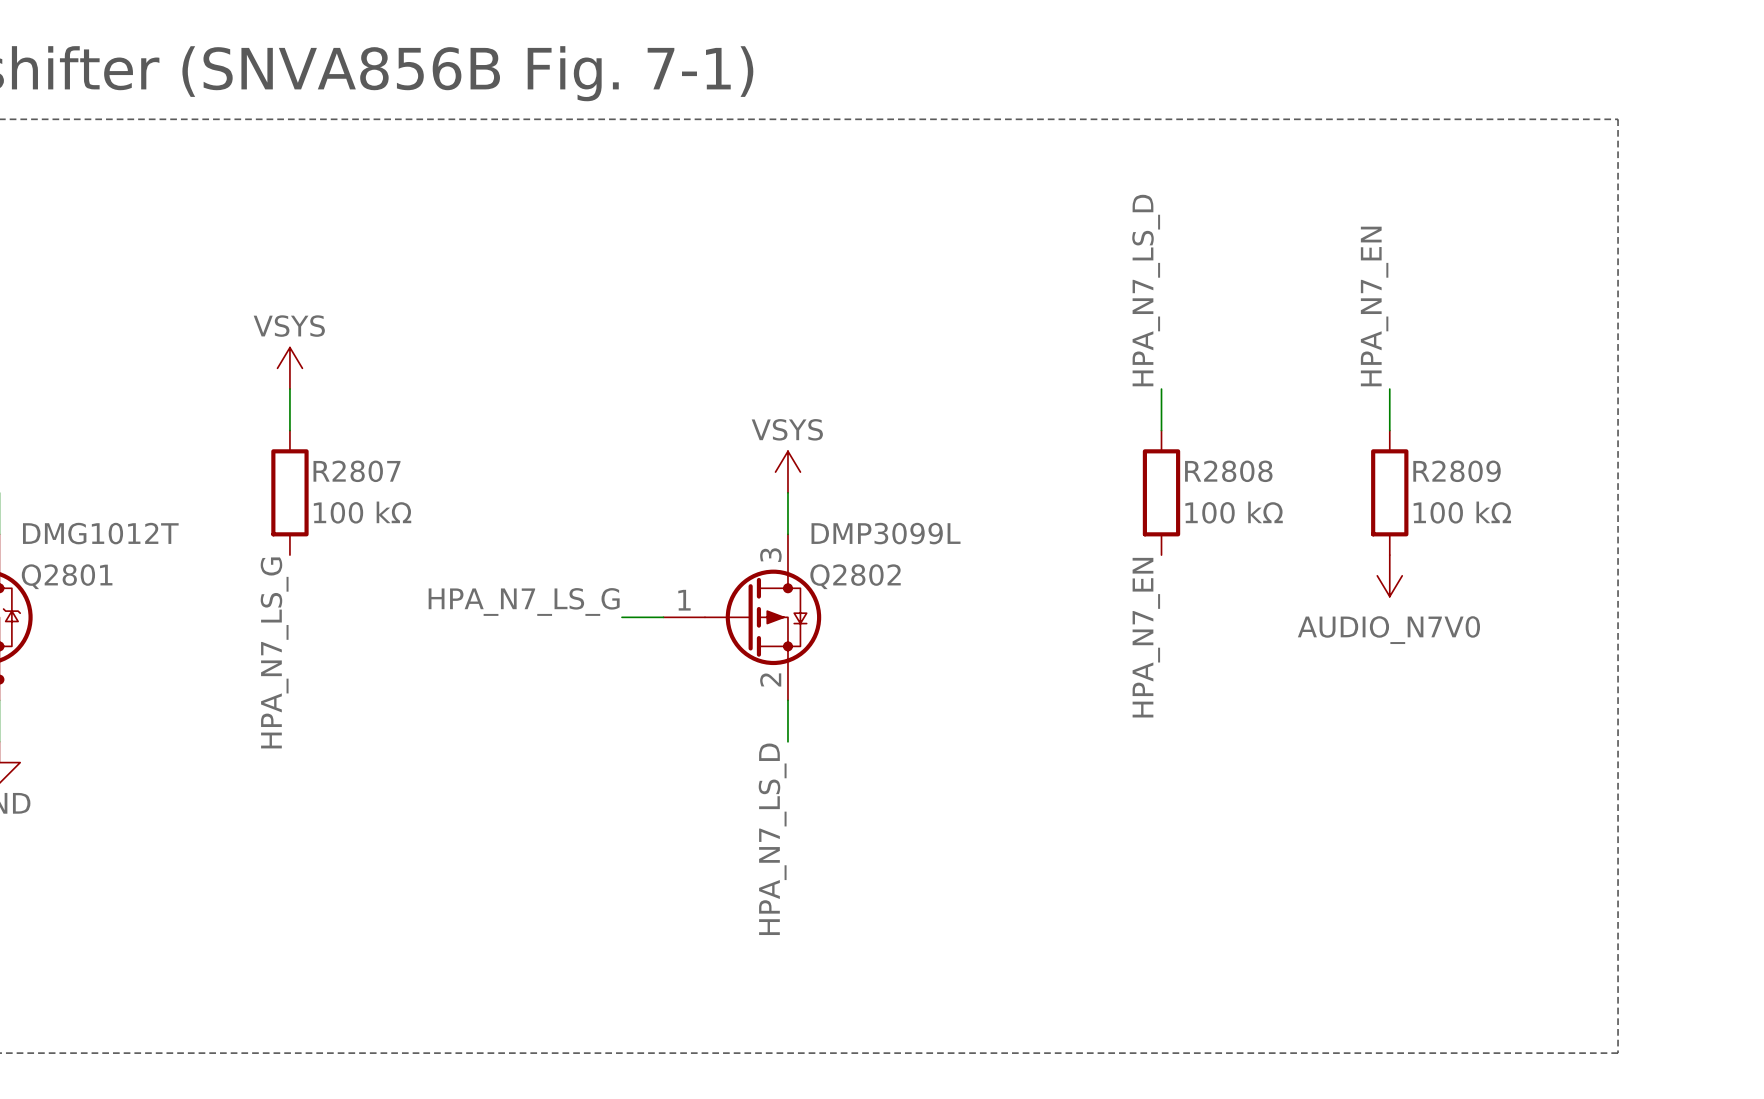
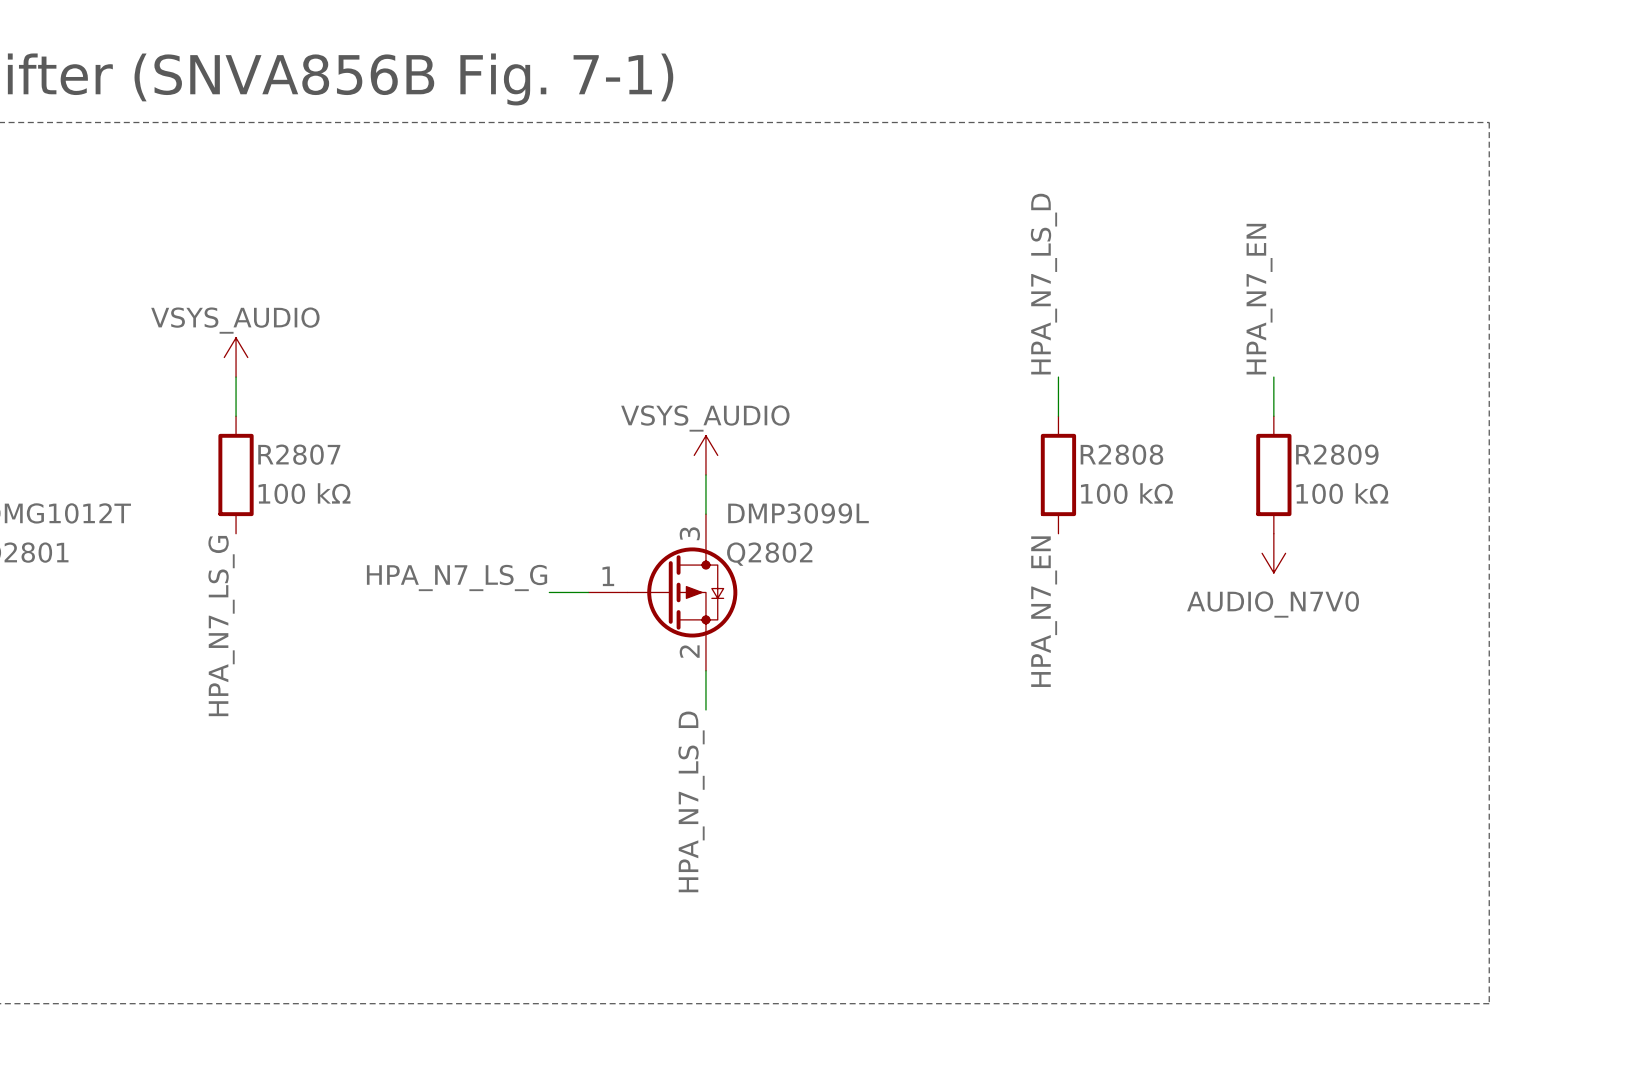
power symbol: VSYS (289, 368) -> VSYS_AUDIO (236, 357)
power symbol: VSYS (787, 472) -> VSYS_AUDIO (705, 455)

